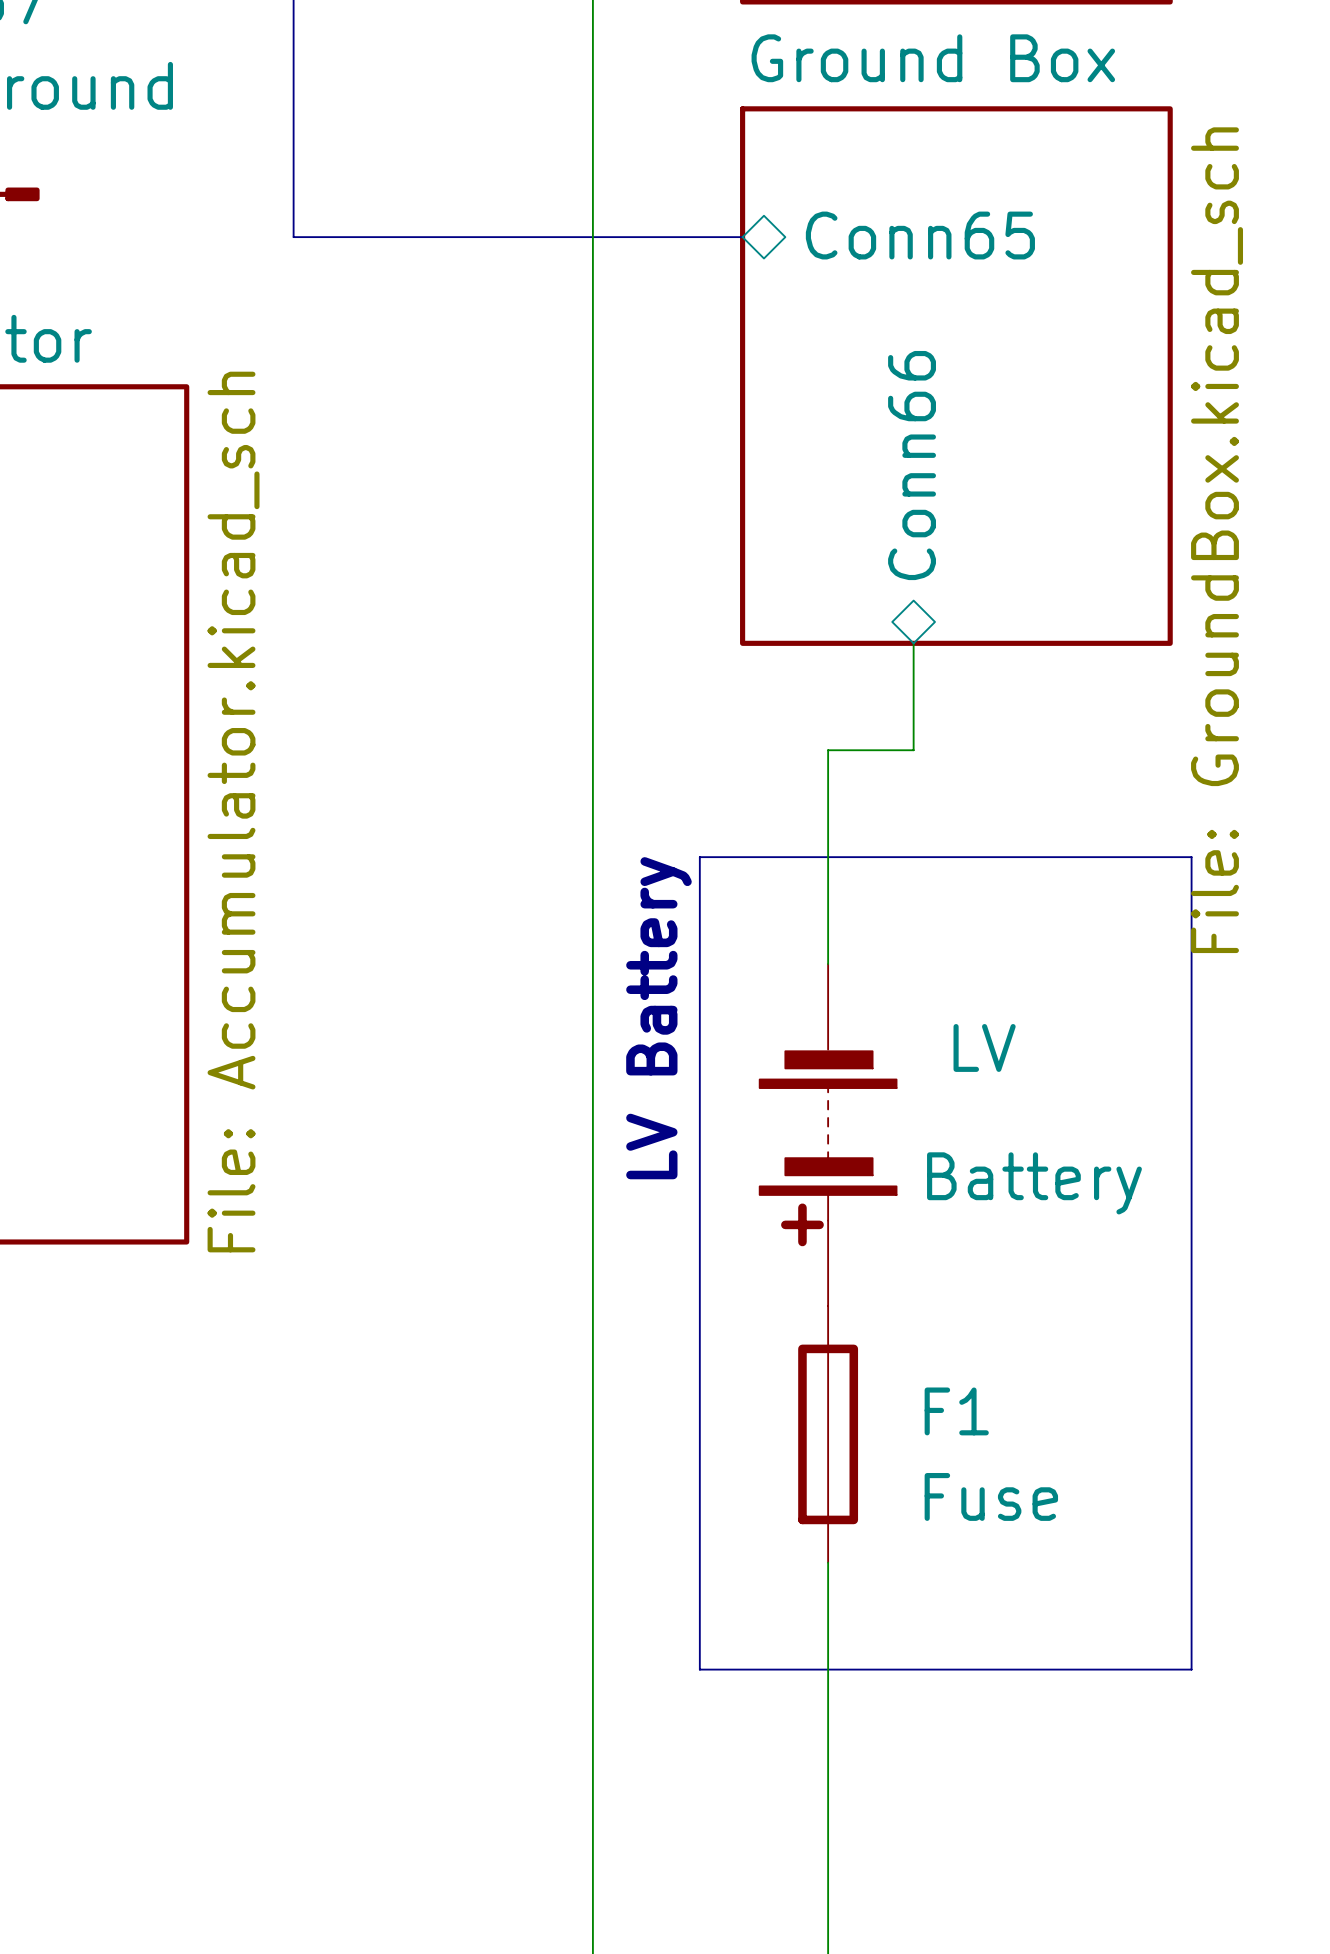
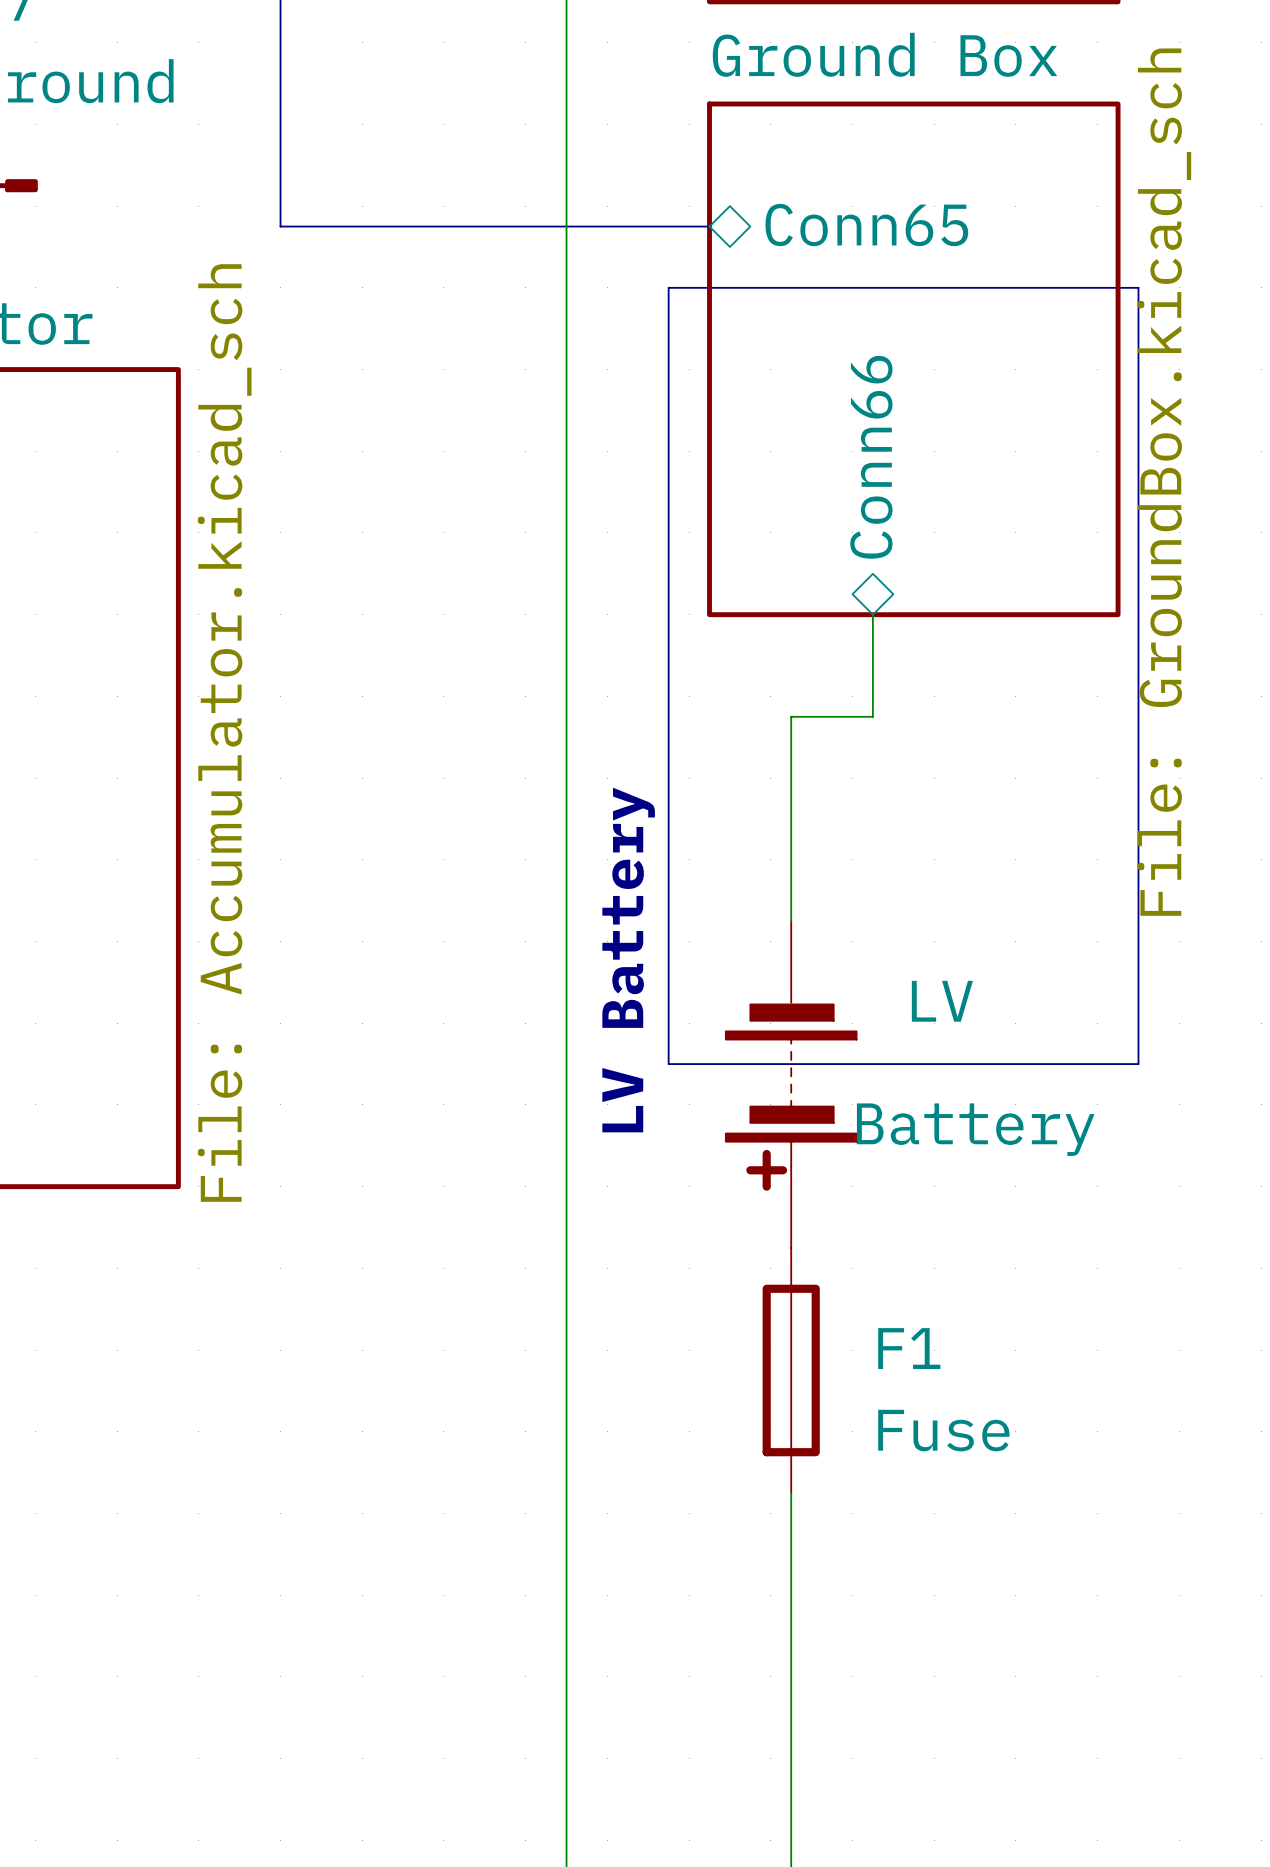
line: (699, 857) (1191, 857) -> (668, 818) (668, 287) (1138, 287) (1138, 818)
line: (699, 1113) (699, 1669) (1191, 1669) (1191, 1113) -> (668, 1064) (1138, 1064)

